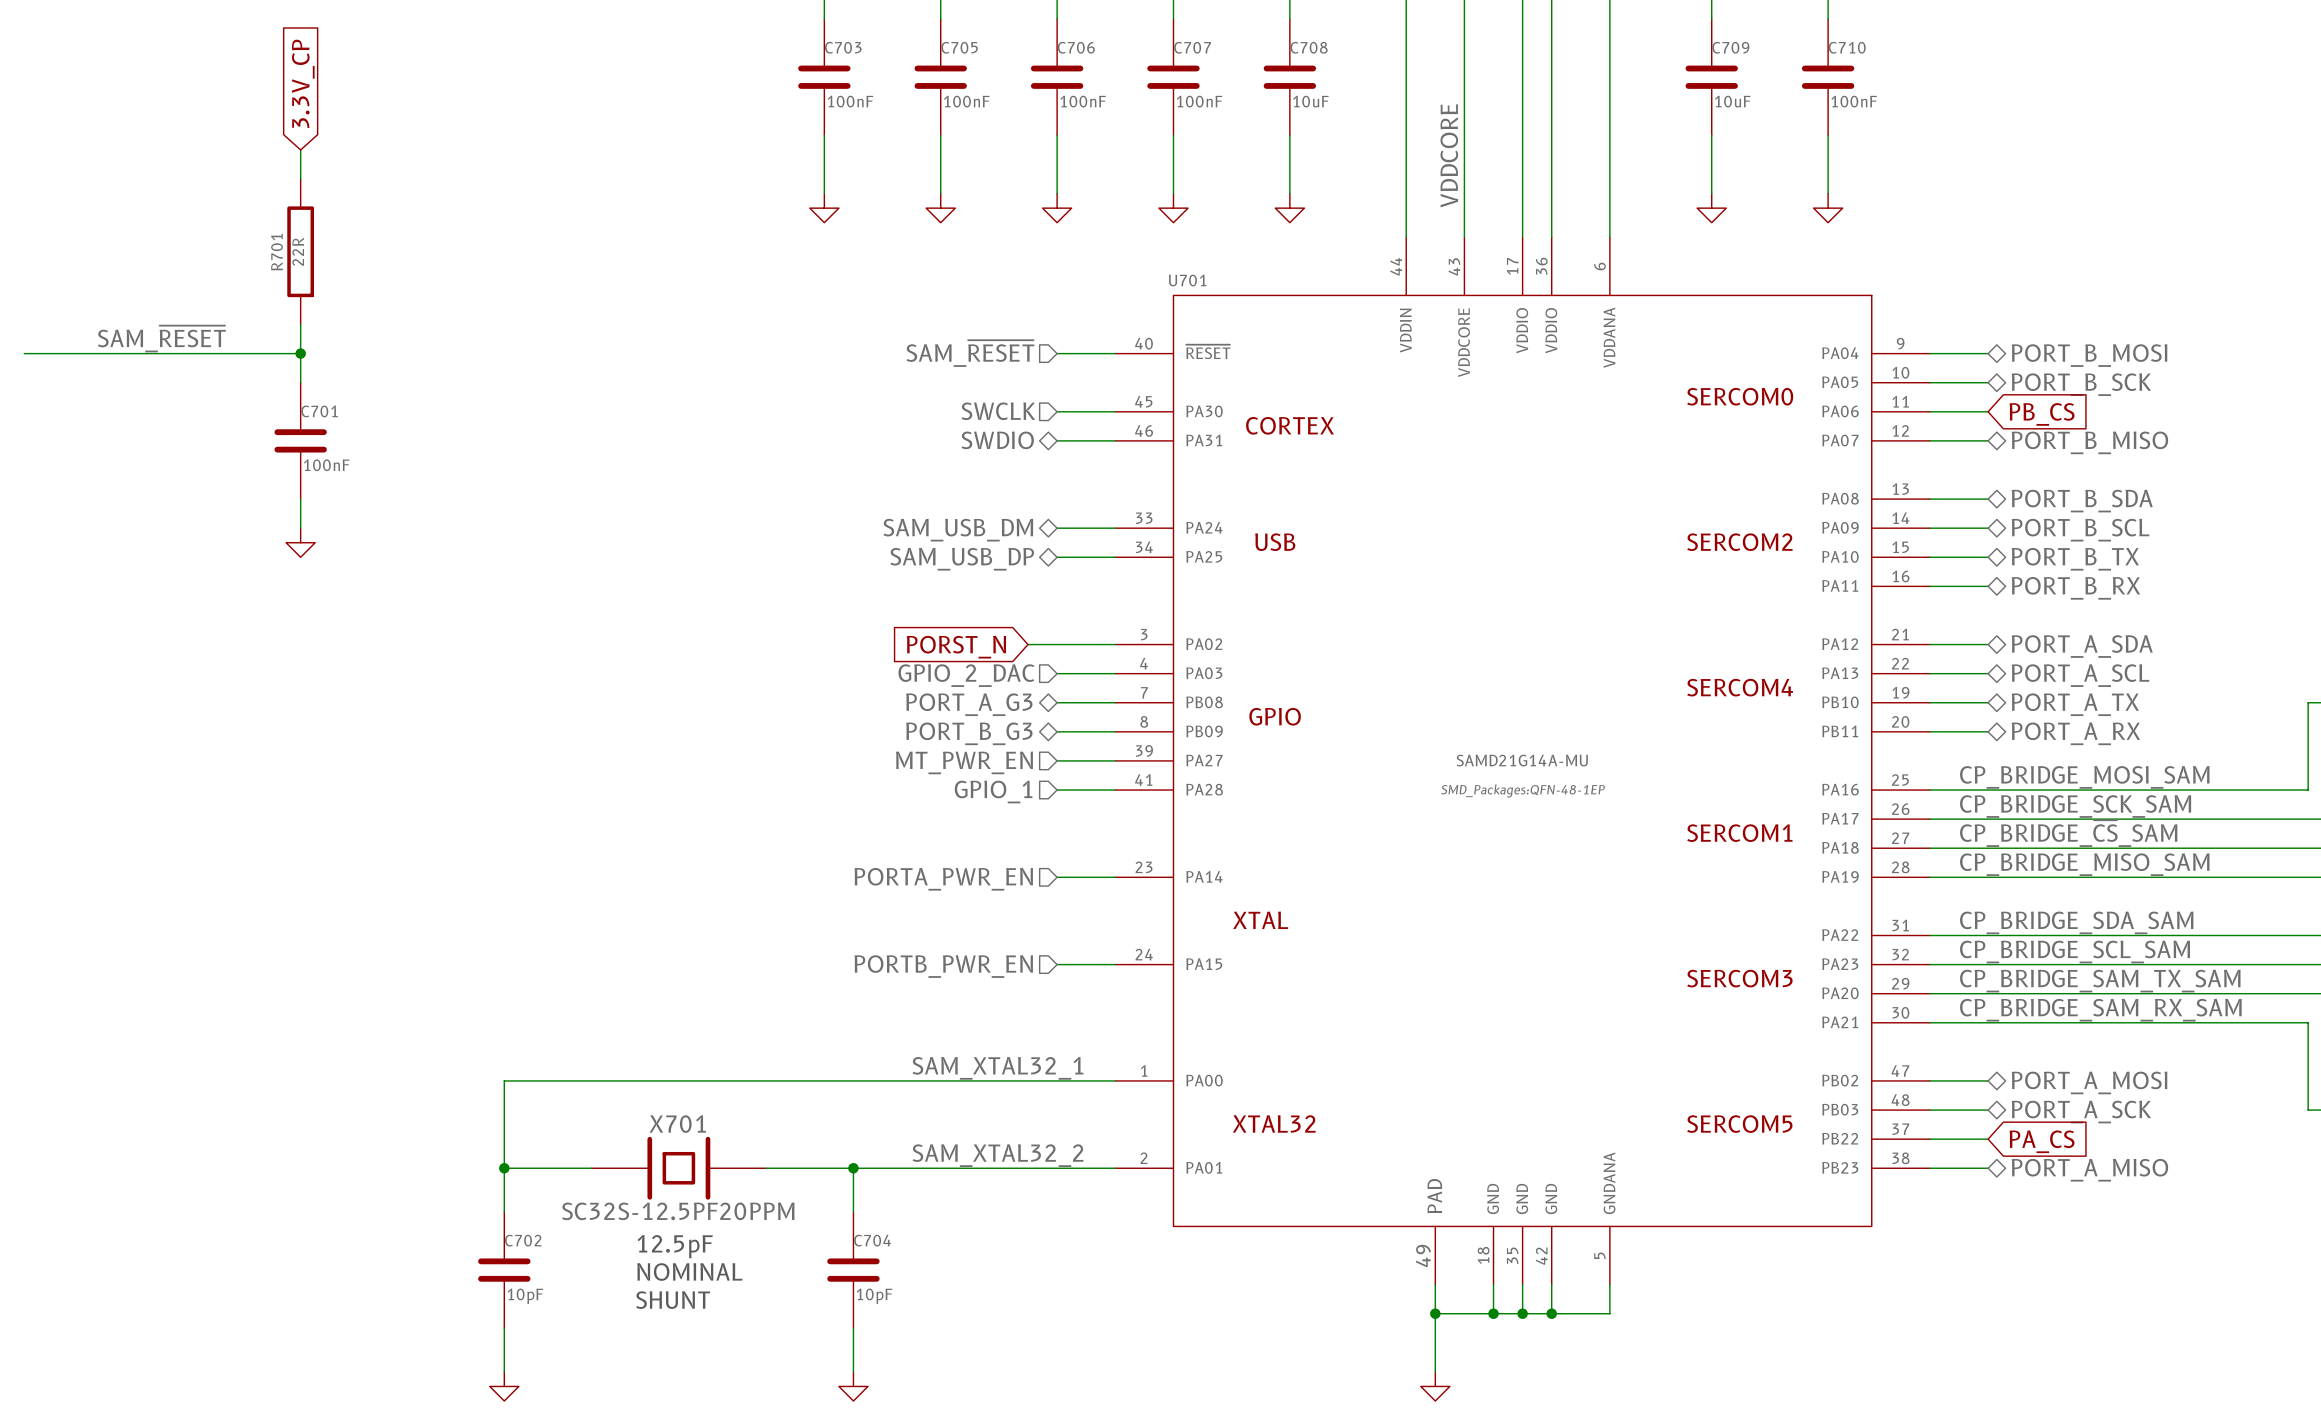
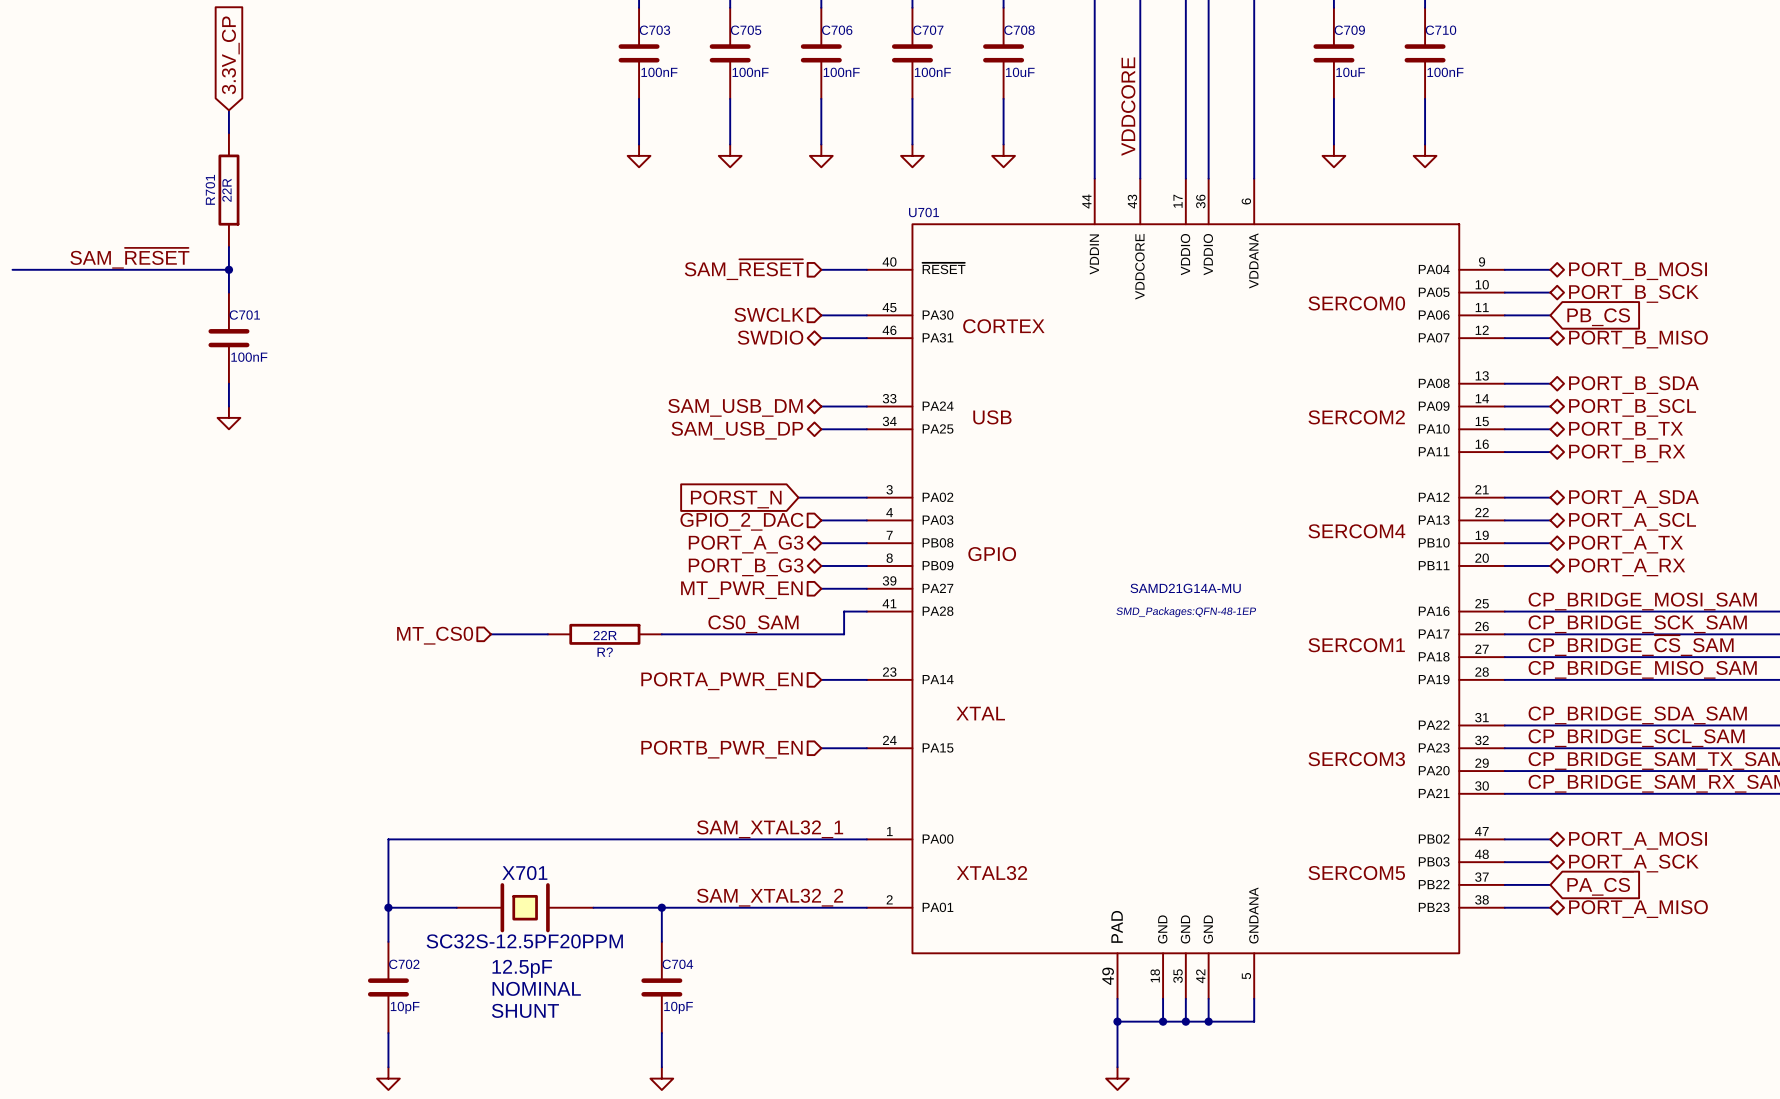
wire: (1057, 790) (1086, 790) -> (661, 634) (844, 634) (844, 611)
hierarchical label: GPIO_1 (993, 791) -> none
label: none -> CS0_SAM (753, 624)
wire: none -> (490, 634) (547, 634)
R?: none -> 22R (604, 634)
hierarchical label: none -> MT_CS0 (435, 635)

